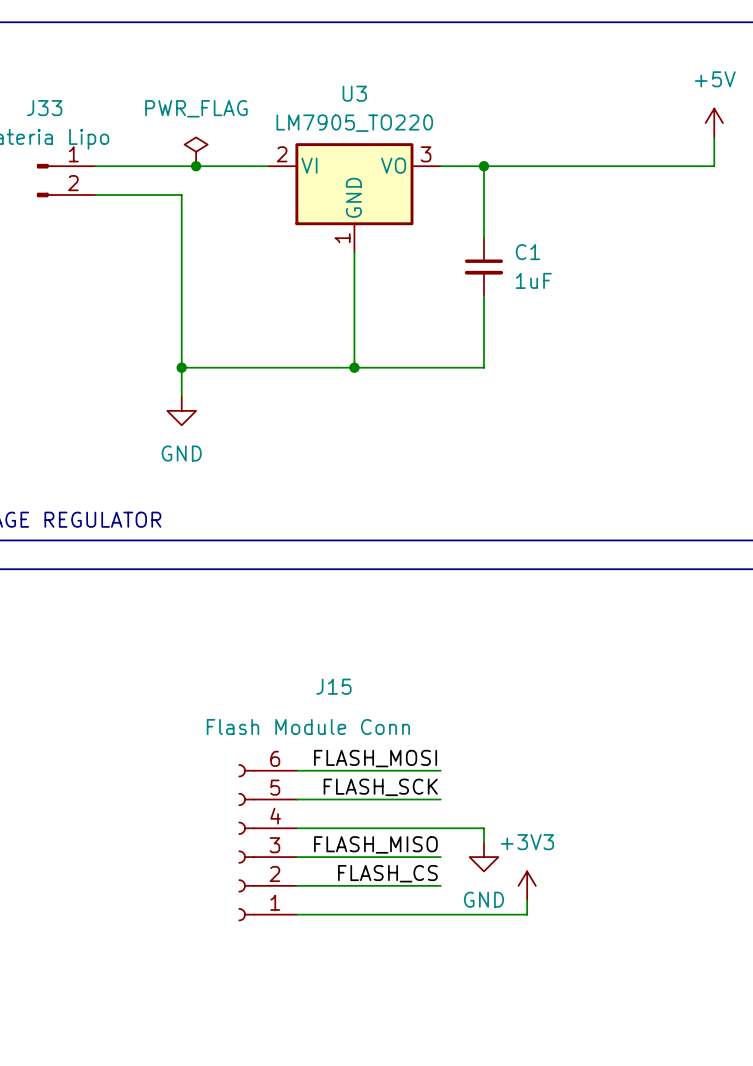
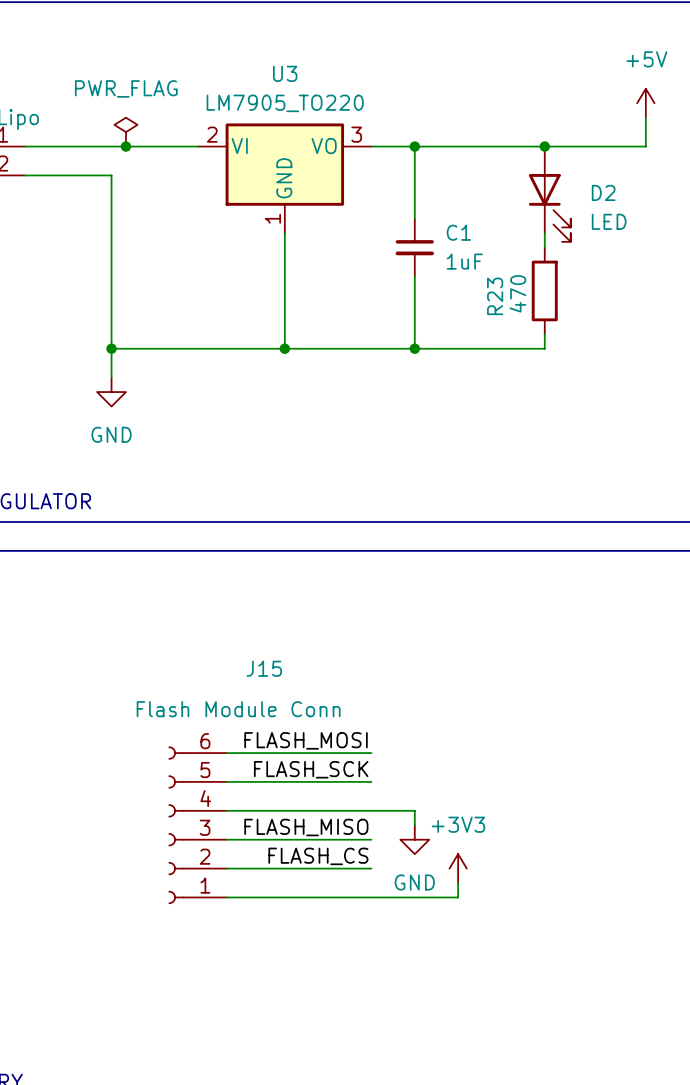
junction: none -> (544, 146)
D2: none -> LED (549, 194)
wire: none -> (544, 233) (544, 247)
R23: none -> 470 (544, 290)
wire: none -> (544, 334) (544, 348) (414, 348)
junction: none -> (414, 348)

